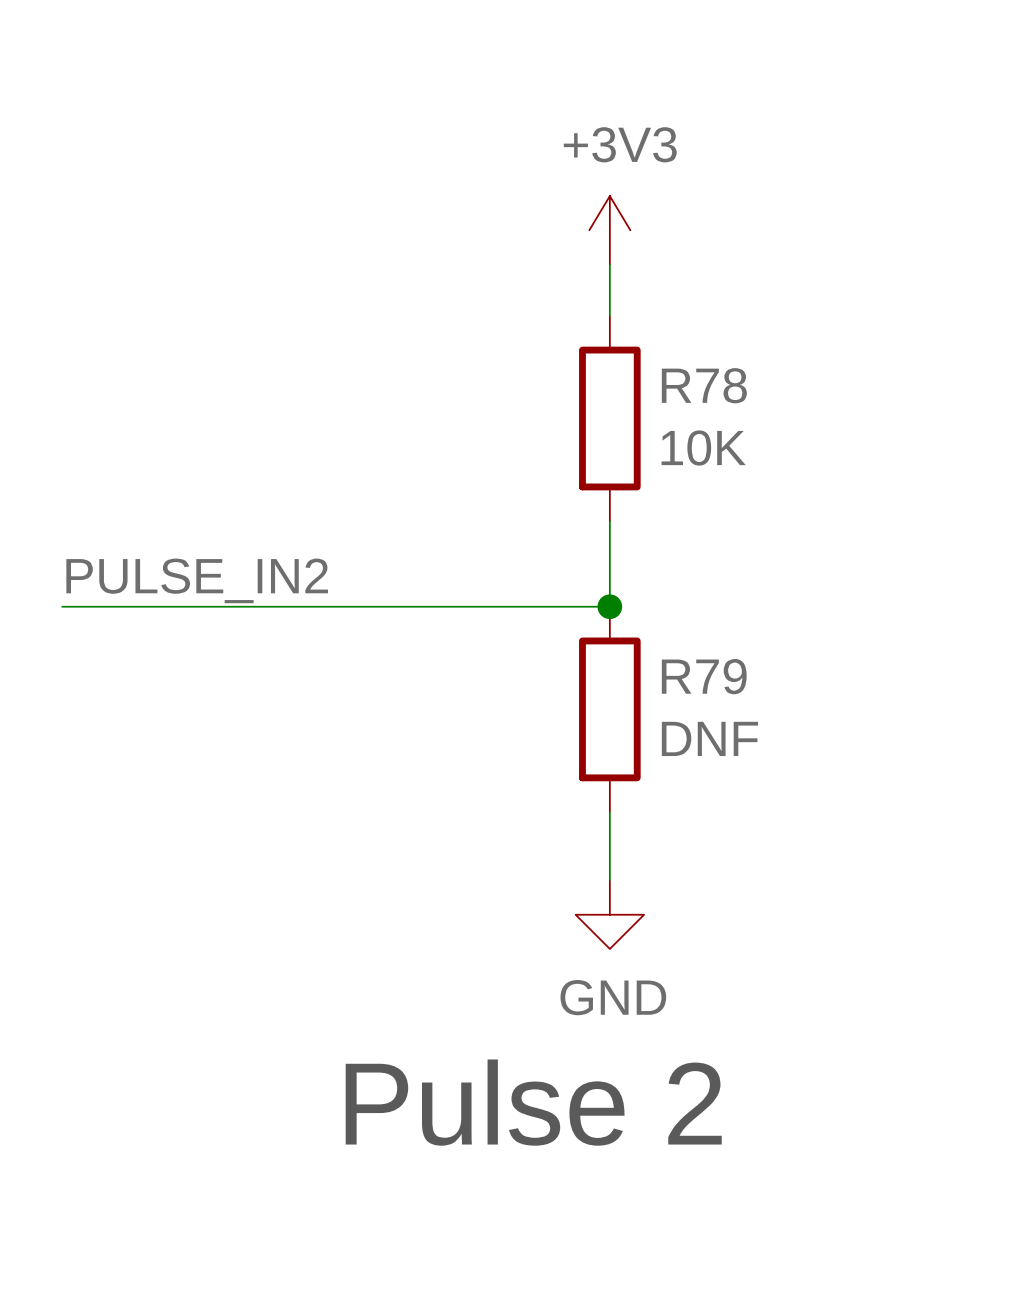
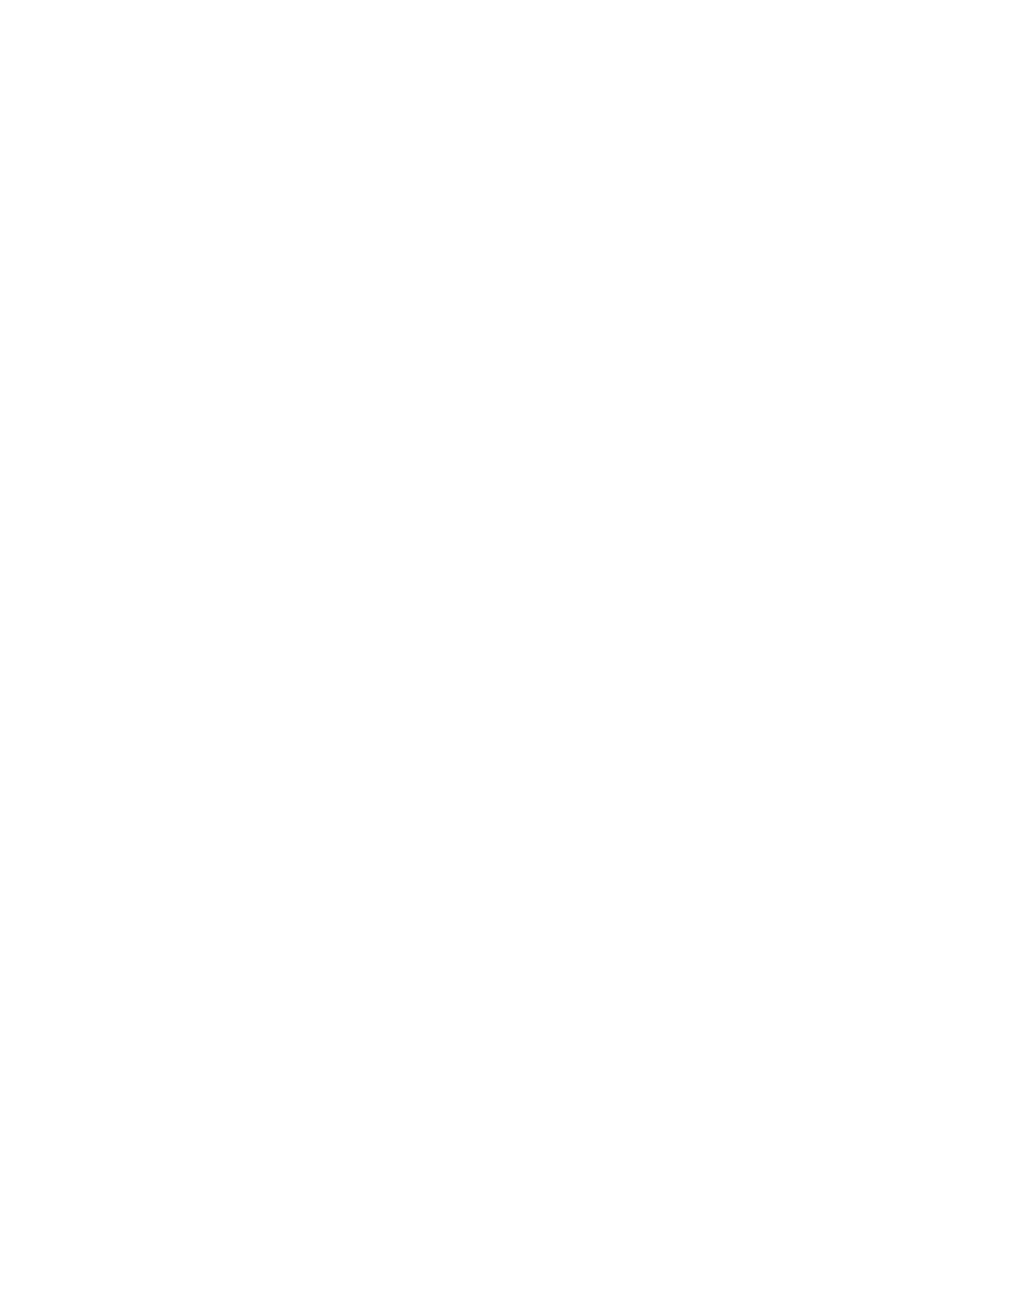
power symbol: +3V3 (609, 230) -> none
wire: (609, 264) (609, 315) -> none
R78: 10K (609, 418) -> none
wire: (609, 521) (609, 606) (62, 606) -> none
label: PULSE_IN2 (197, 580) -> none
junction: (609, 606) -> none
R79: DNF (609, 709) -> none
wire: (609, 812) (609, 880) -> none
power symbol: GND (609, 914) -> none
text: Pulse 2 (533, 1102) -> none

